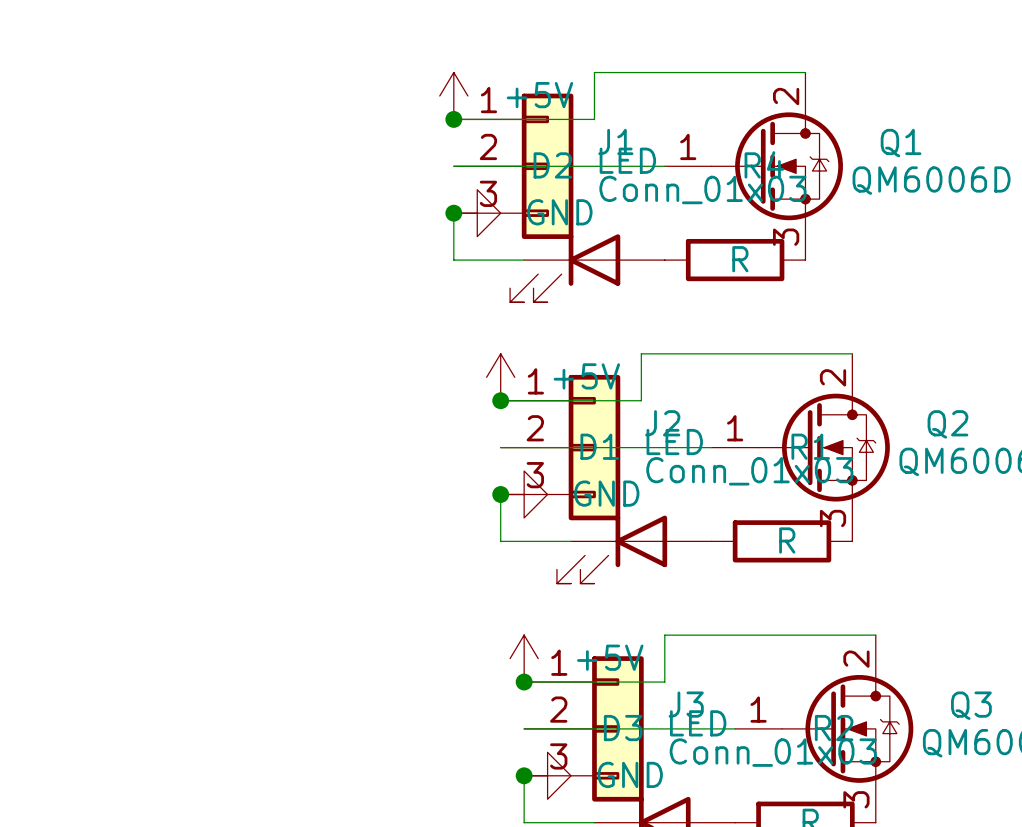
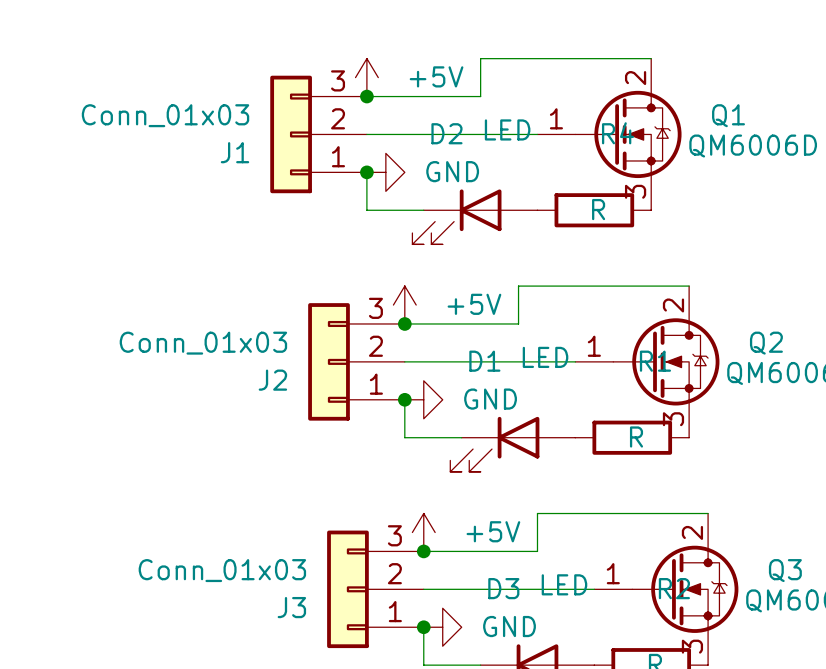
J1 position: (513, 166) -> (318, 134)
J1 rotation: 0° (547, 166) -> 180° (291, 134)
J2 position: (560, 447) -> (356, 361)
J2 rotation: 0° (594, 447) -> 180° (329, 361)
J3 position: (583, 728) -> (375, 589)
J3 rotation: 0° (617, 728) -> 180° (347, 589)

